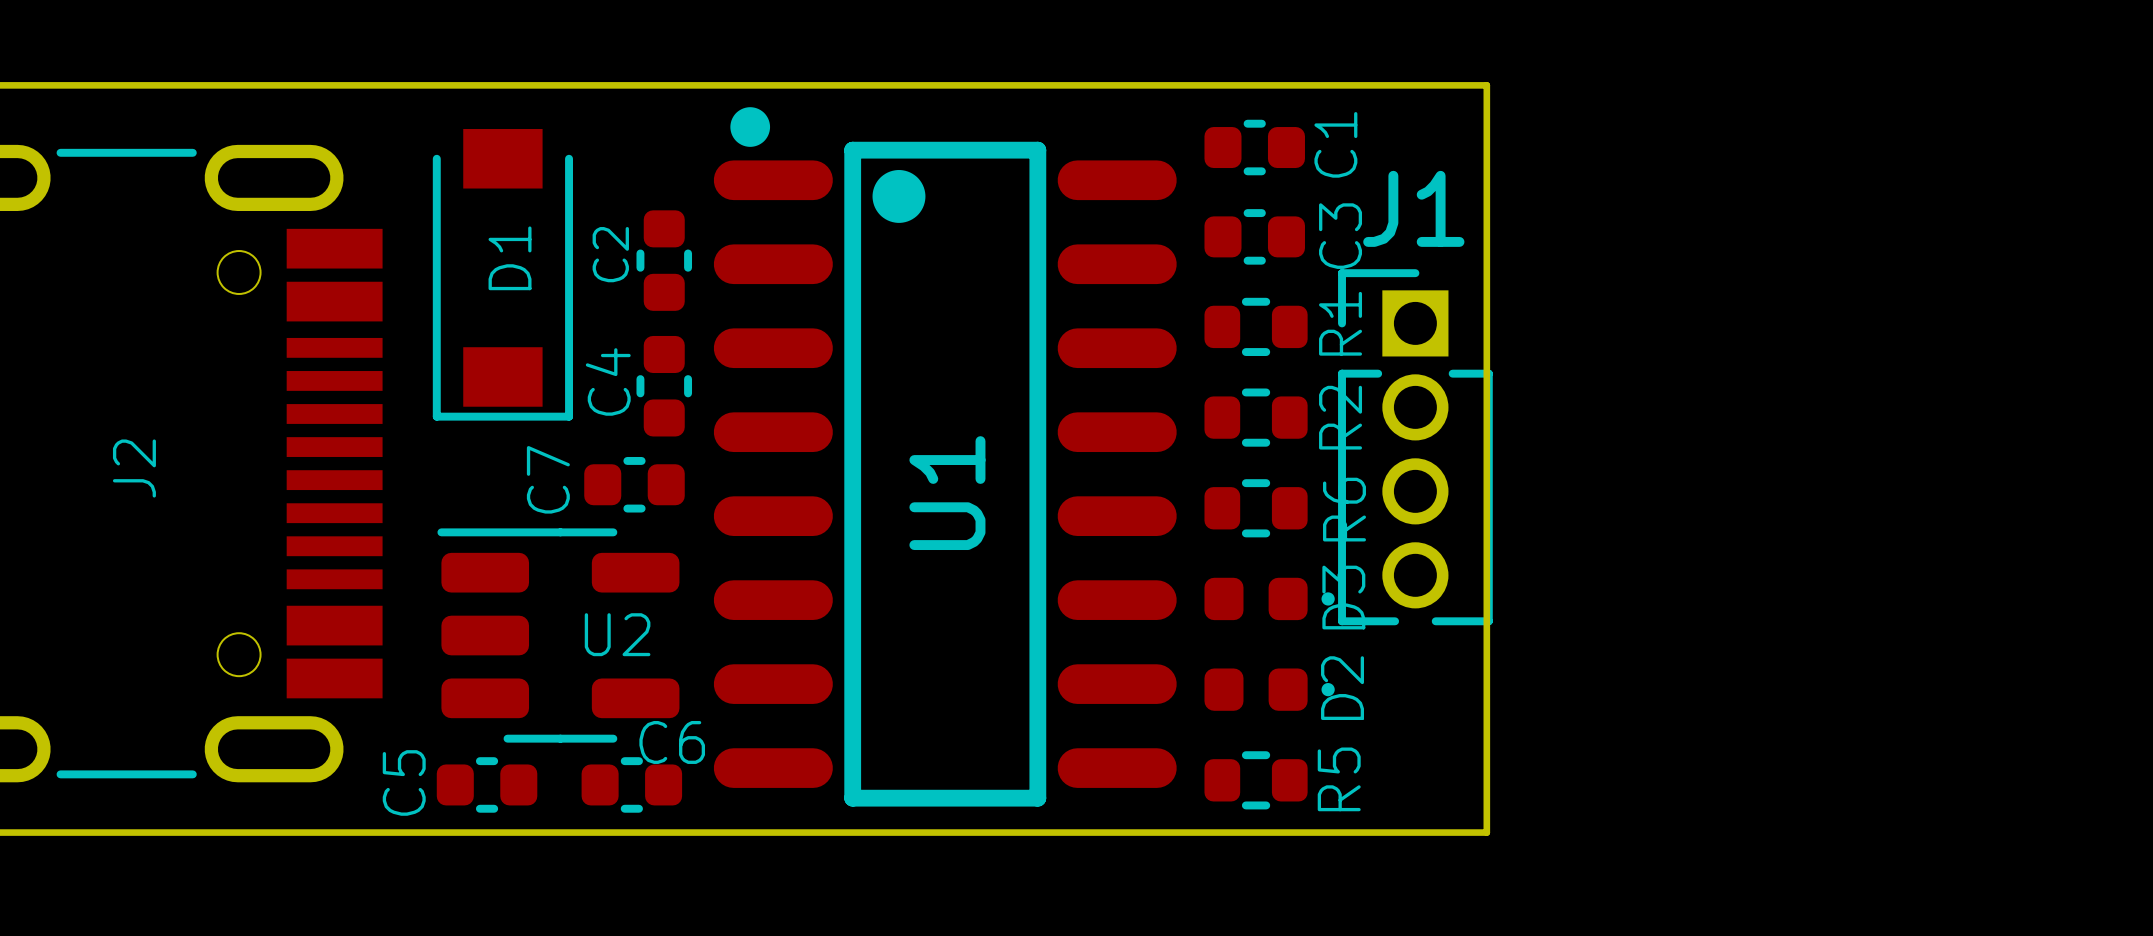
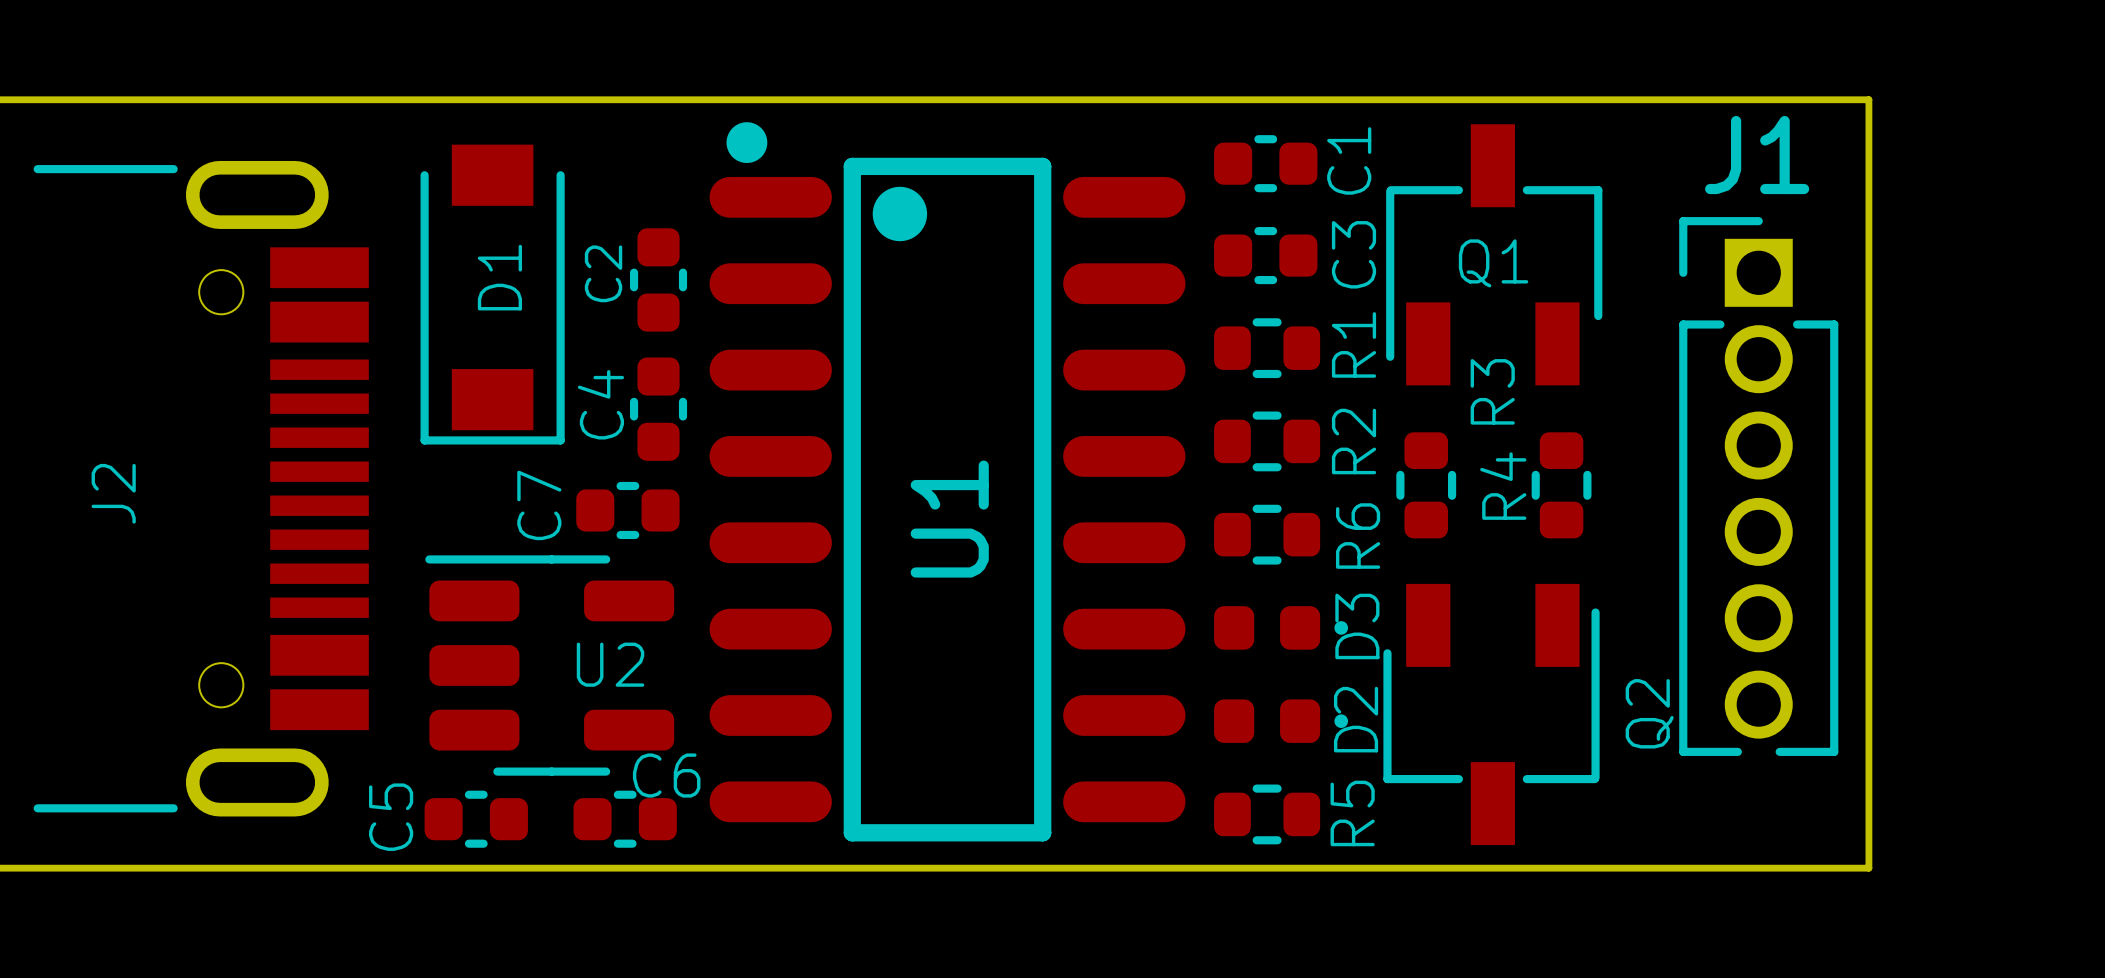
board edge: (1486, 85) (1486, 832) -> (1504, 99) (1868, 99) (1868, 868) (1504, 868)
Q1: none -> (1494, 254)
J1 footprint: [1338, 269, 1493, 626] -> [1679, 217, 1839, 756]
R3: none -> (1426, 485)
R4: none -> (1561, 485)
Q2: none -> (1491, 714)

